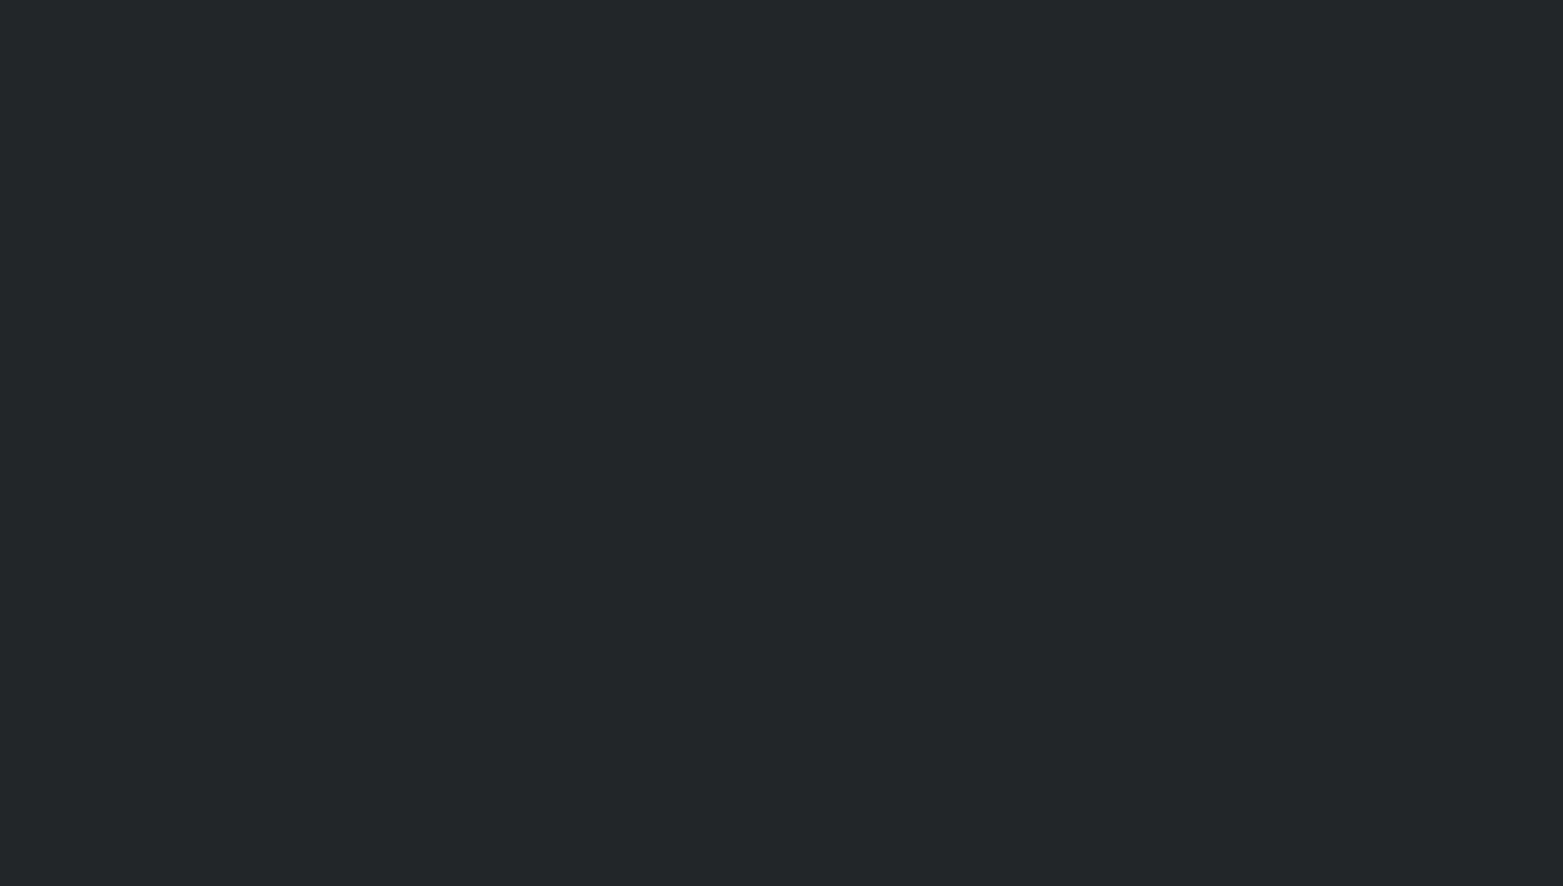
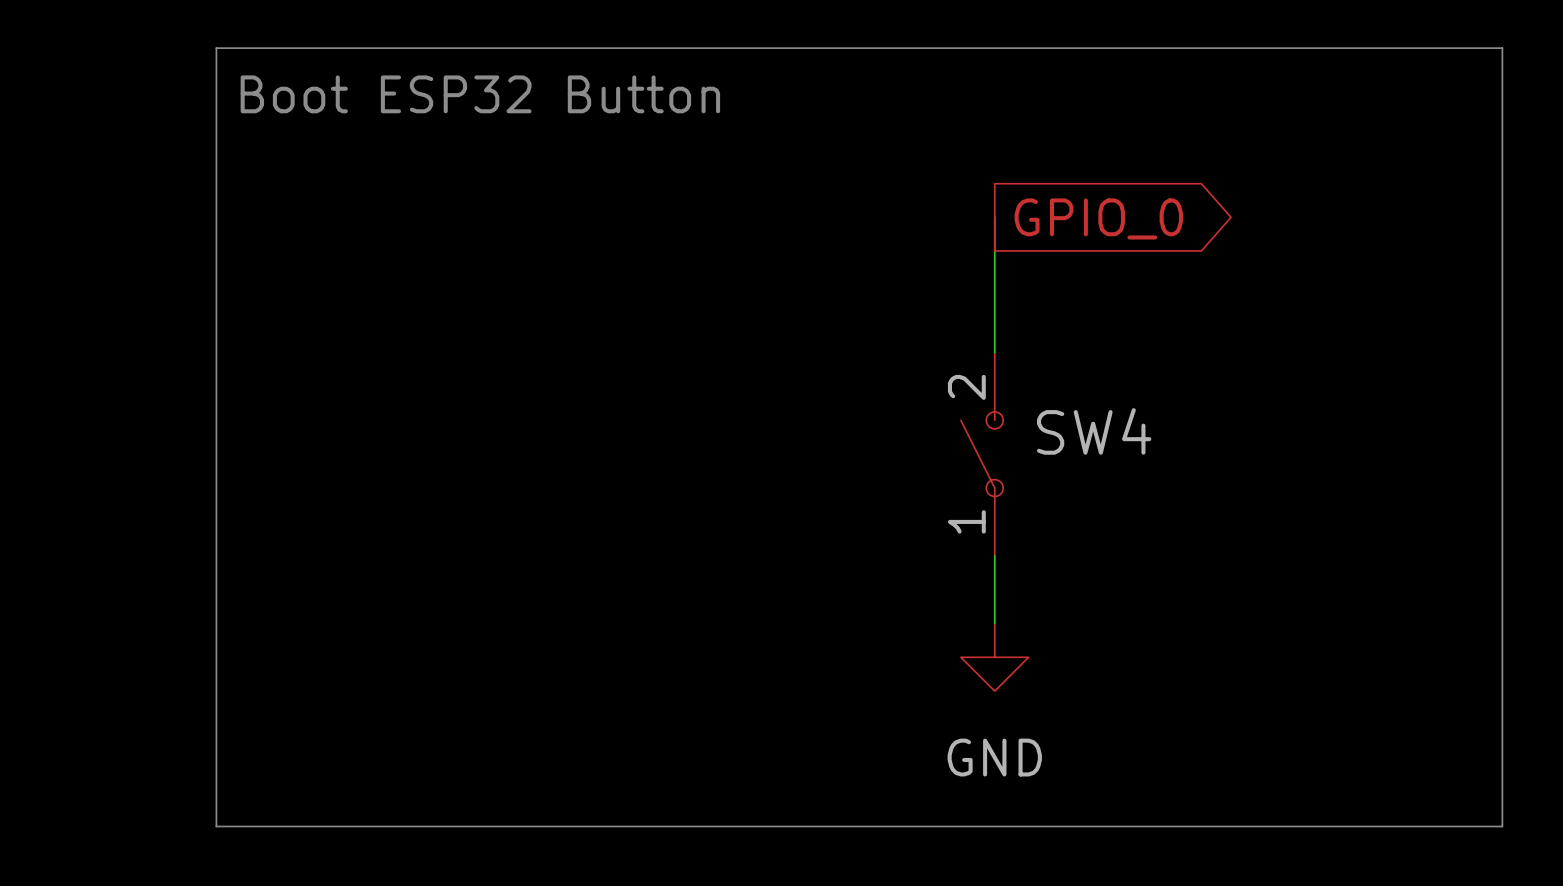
line: none -> (216, 48) (1502, 48) (1502, 826) (216, 826) (216, 48)
text: none -> Boot ESP32 Button (480, 94)
wire: none -> (994, 217) (994, 352)
global label: none -> GPIO_0 (1098, 218)
SW4: none -> (982, 454)
wire: none -> (994, 555) (994, 623)
power symbol: none -> GND (994, 657)

